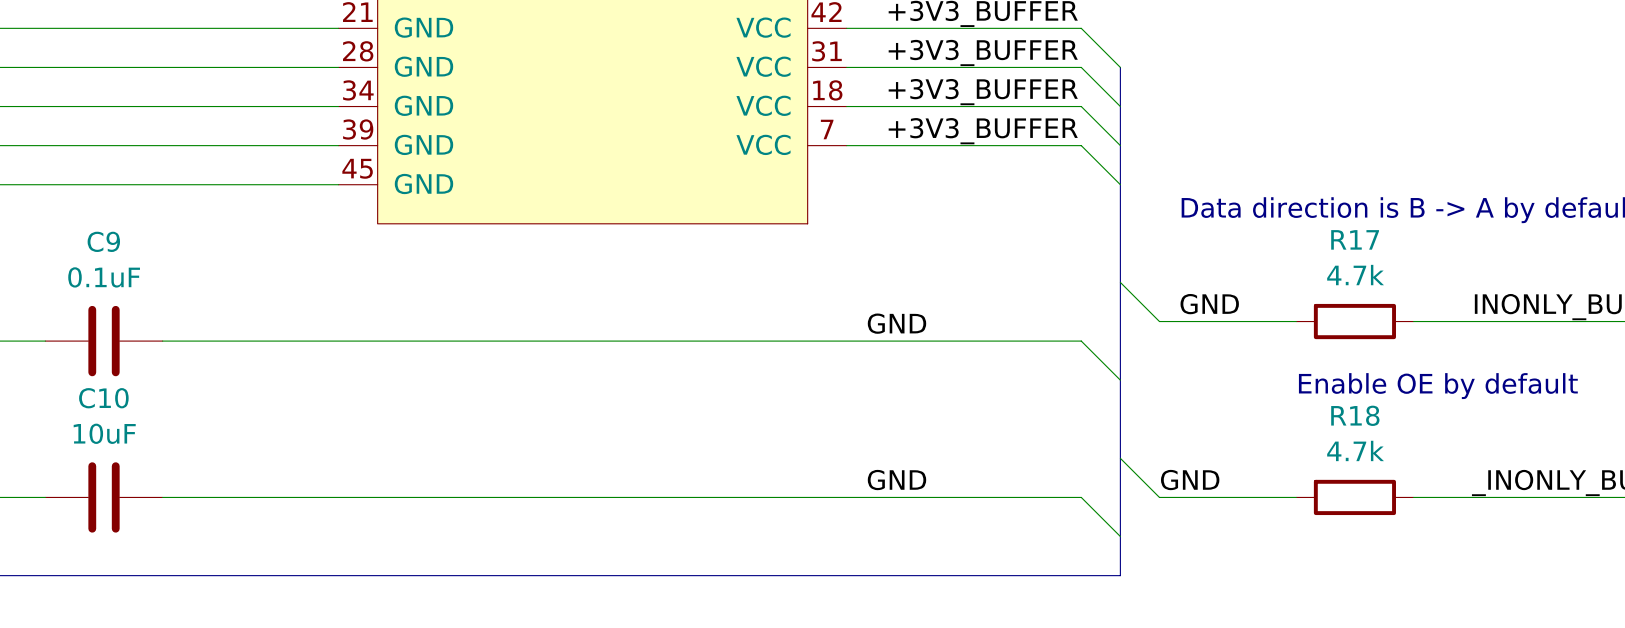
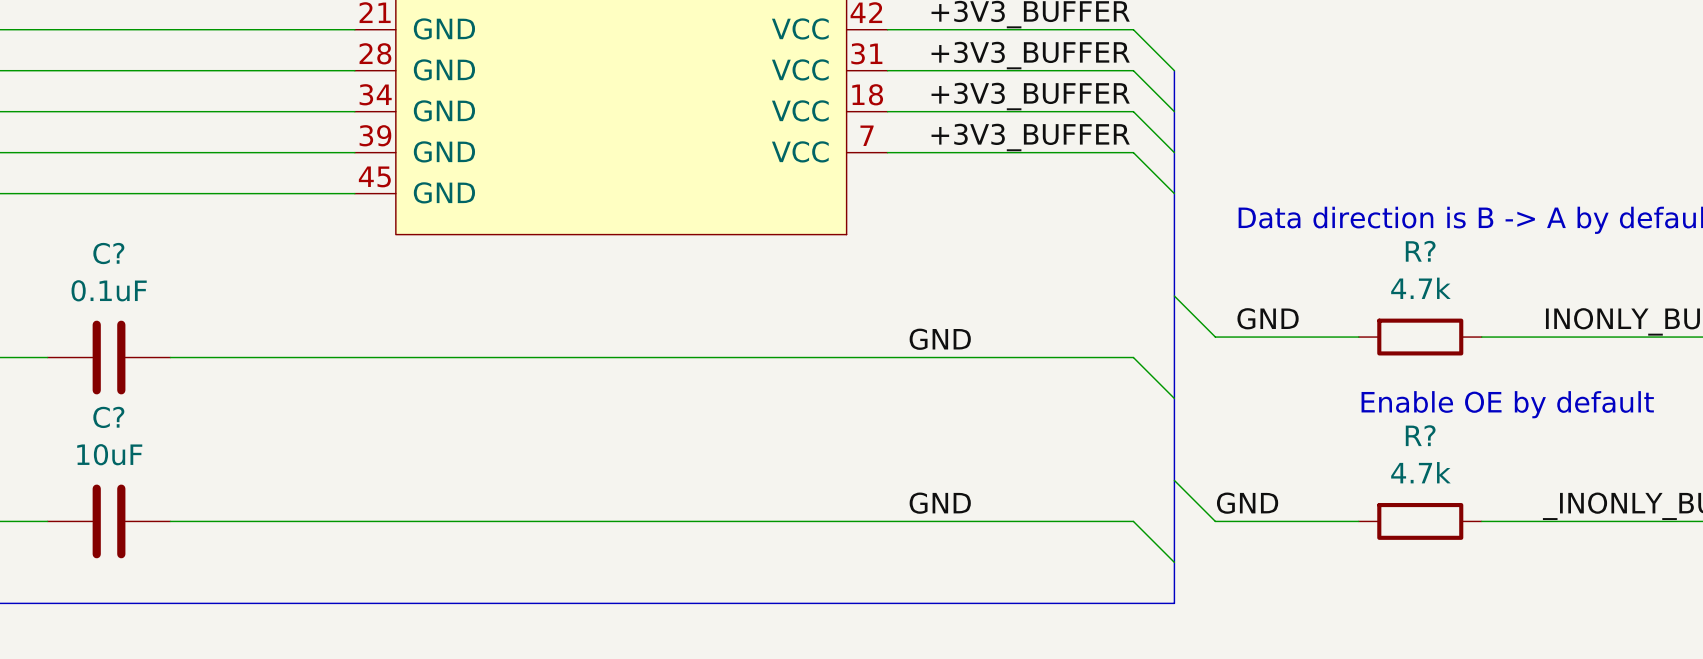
R17 name: R17 (1355, 239) -> R? (1420, 251)
C9 name: C9 (103, 241) -> C? (108, 253)
C10 name: C10 (103, 398) -> C? (108, 417)
R18 name: R18 (1355, 415) -> R? (1420, 435)

